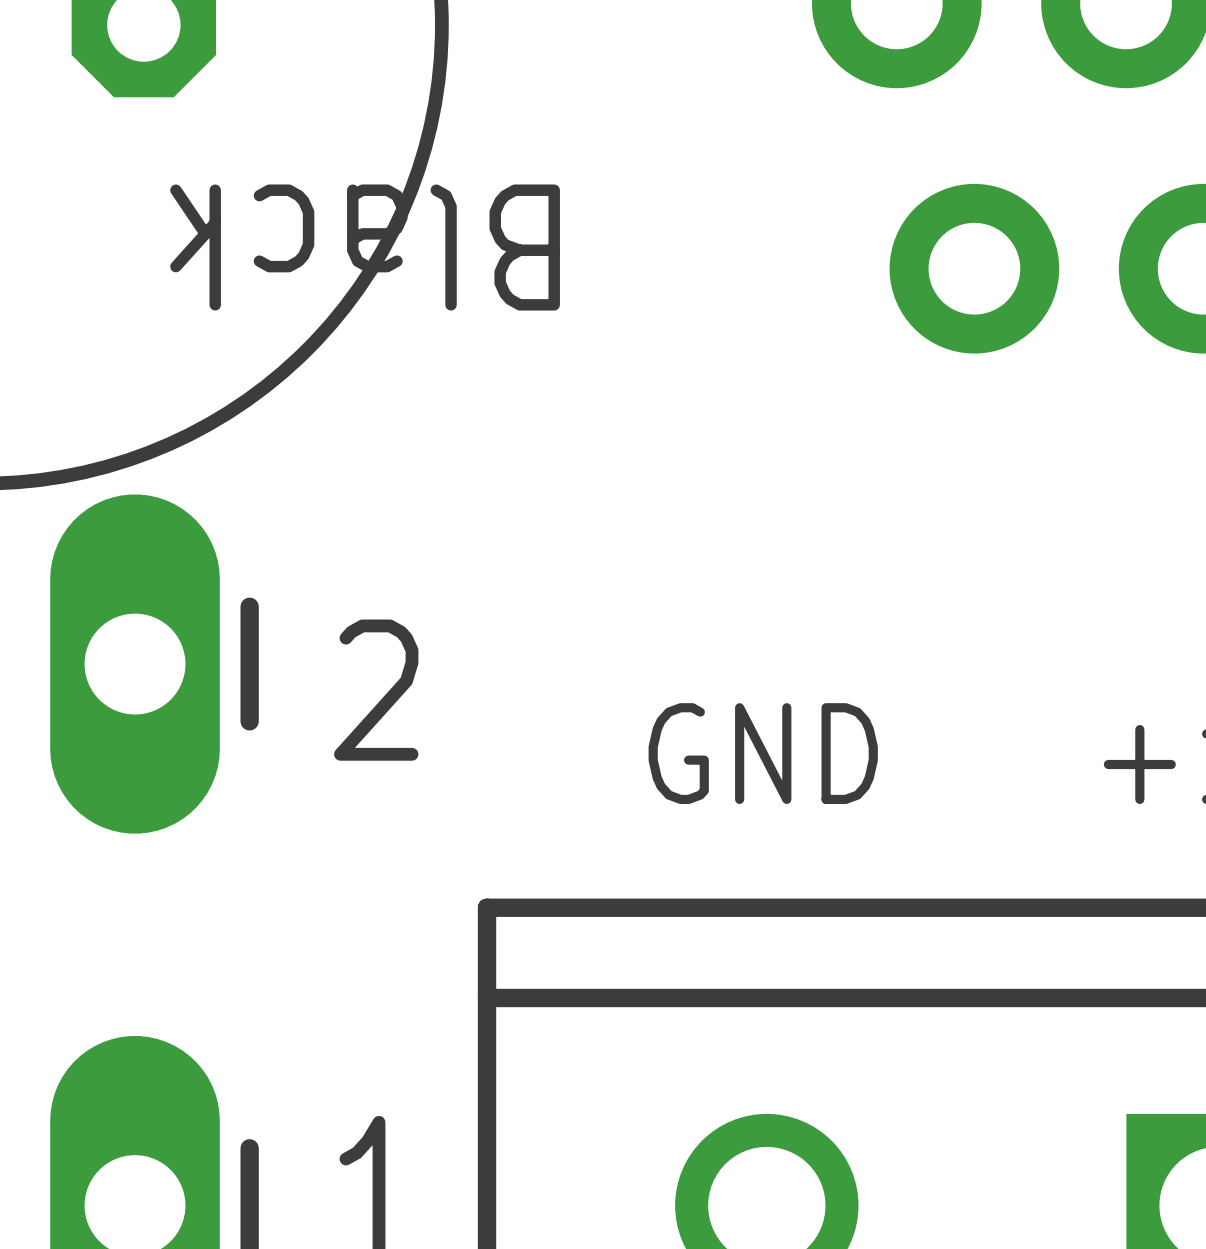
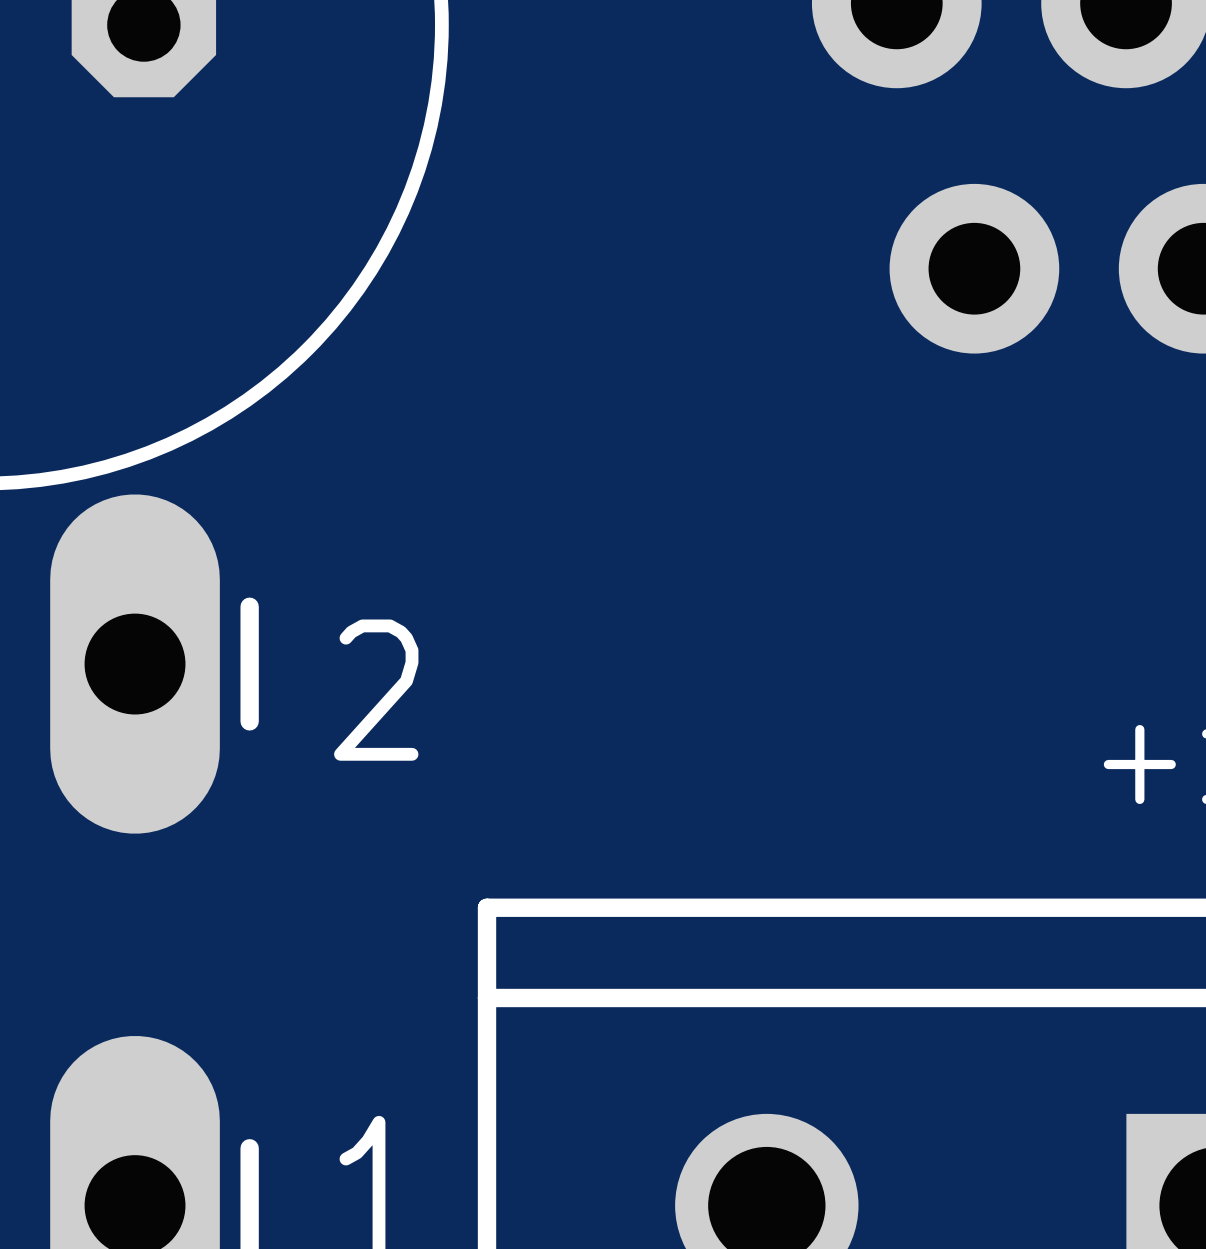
text: Black (365, 247) -> none
text: GND (763, 753) -> none

